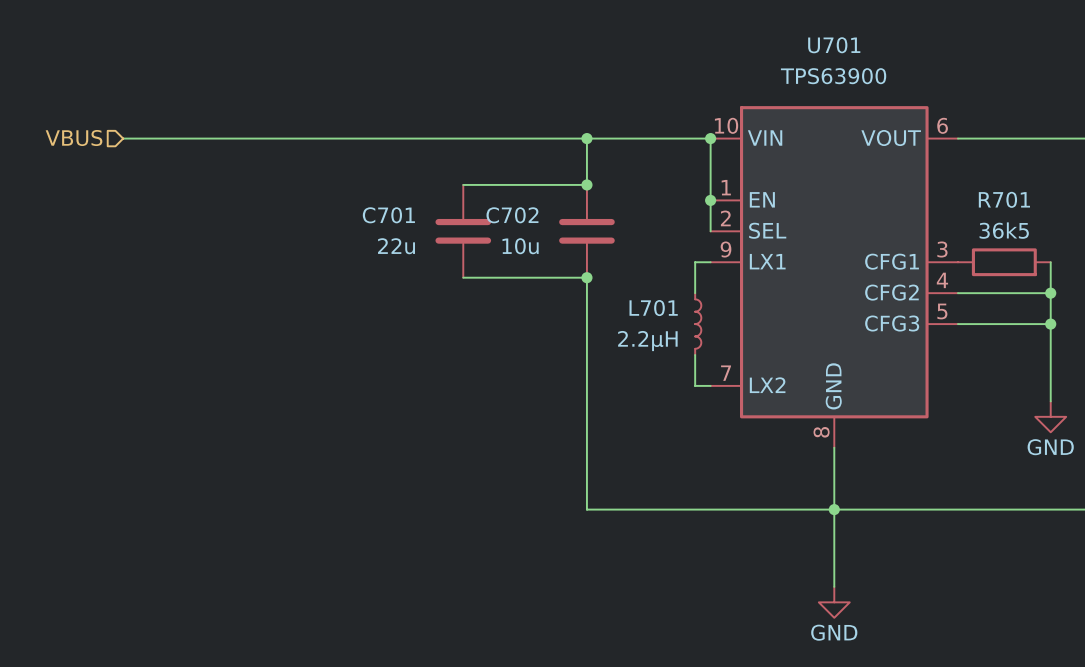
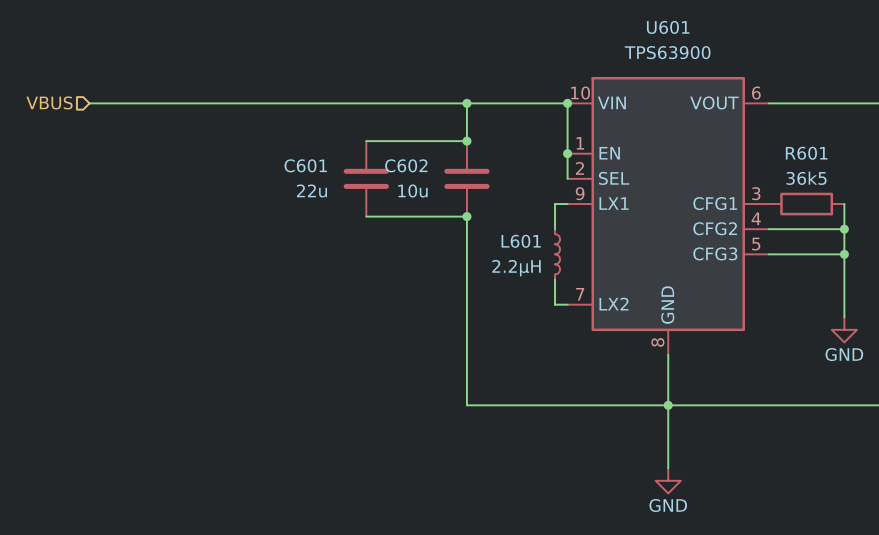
U701 name: U701 (834, 45) -> U601 (668, 27)
R701 name: R701 (1004, 199) -> R601 (806, 153)
C701 name: C701 (388, 215) -> C601 (305, 165)
C702 name: C702 (512, 215) -> C602 (406, 165)
L701 name: L701 (653, 308) -> L601 (521, 241)

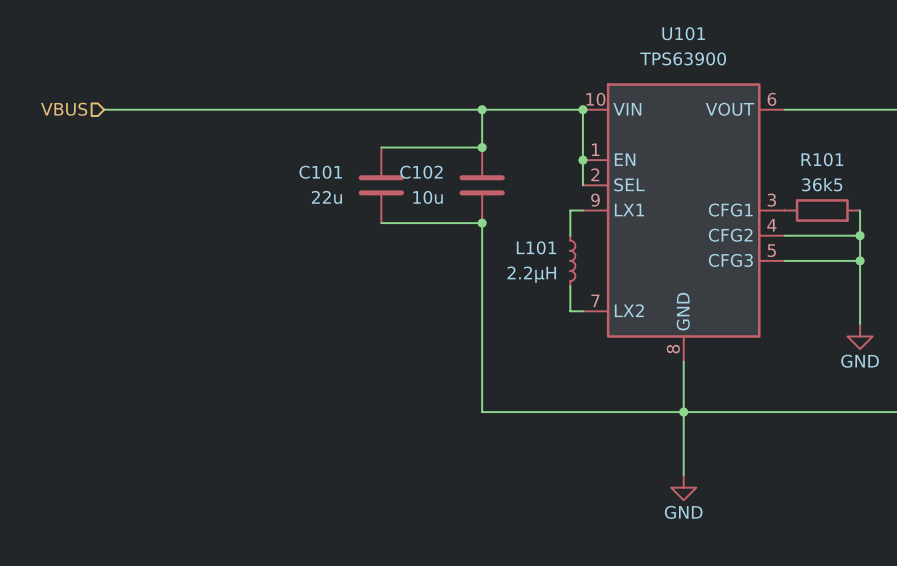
U601 name: U601 (668, 27) -> U101 (683, 33)
R601 name: R601 (806, 153) -> R101 (822, 159)
C601 name: C601 (305, 165) -> C101 (320, 172)
C602 name: C602 (406, 165) -> C102 (421, 172)
L601 name: L601 (521, 241) -> L101 (536, 247)

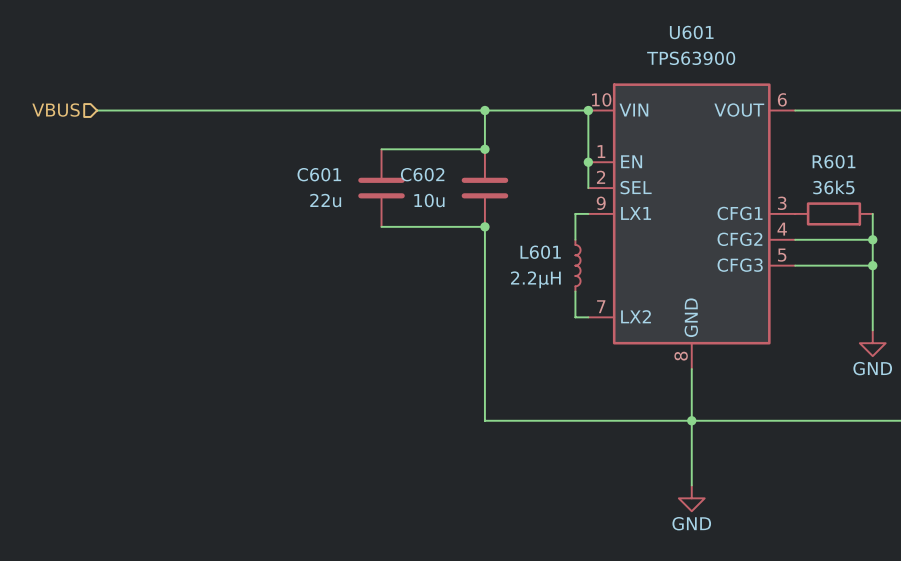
U101 name: U101 (683, 33) -> U601 (691, 32)
R101 name: R101 (822, 159) -> R601 (834, 161)
C101 name: C101 (320, 172) -> C601 (319, 174)
C102 name: C102 (421, 172) -> C602 (422, 174)
L101 name: L101 (536, 247) -> L601 (540, 252)

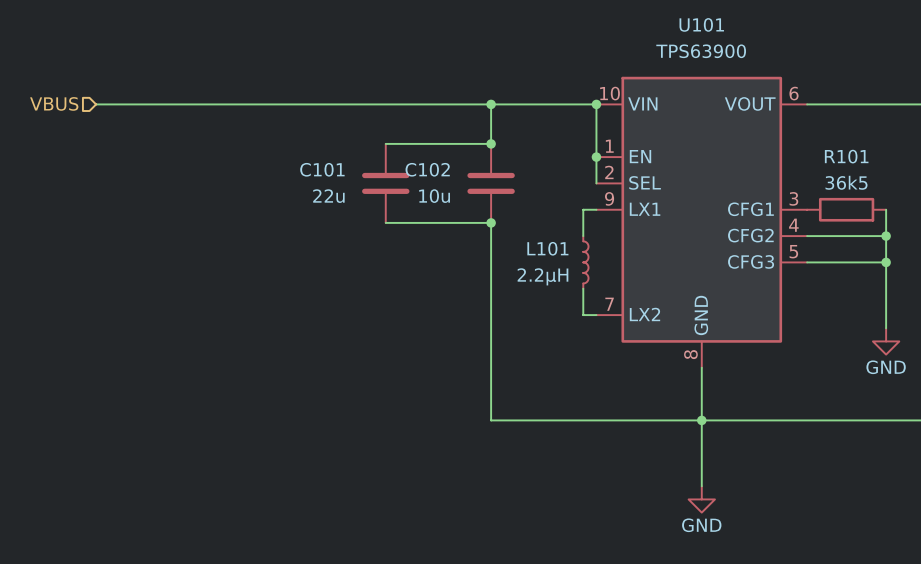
U601 name: U601 (691, 32) -> U101 (701, 24)
R601 name: R601 (834, 161) -> R101 (846, 156)
C601 name: C601 (319, 174) -> C101 (322, 169)
C602 name: C602 (422, 174) -> C102 (427, 169)
L601 name: L601 (540, 252) -> L101 (547, 248)

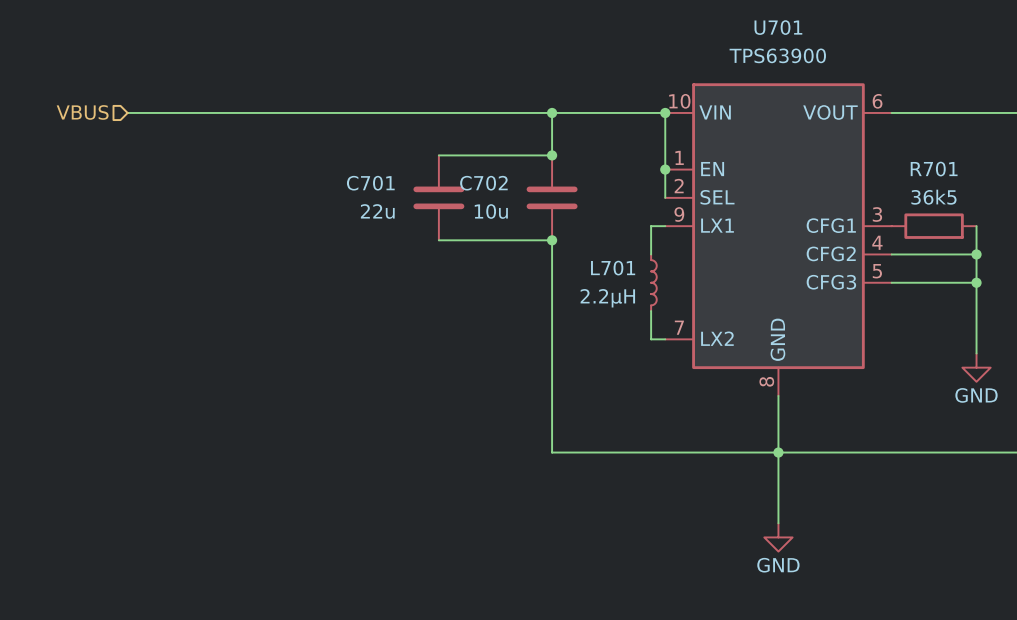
U101 name: U101 (701, 24) -> U701 (778, 27)
R101 name: R101 (846, 156) -> R701 (934, 169)
C101 name: C101 (322, 169) -> C701 (370, 183)
C102 name: C102 (427, 169) -> C702 (483, 183)
L101 name: L101 (547, 248) -> L701 (613, 268)

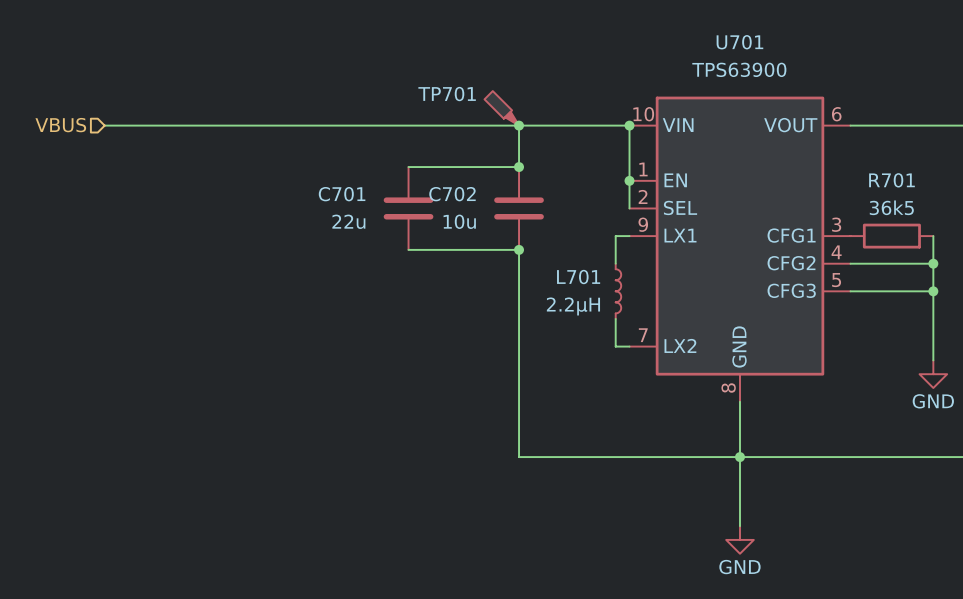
TP701: none -> (501, 108)

